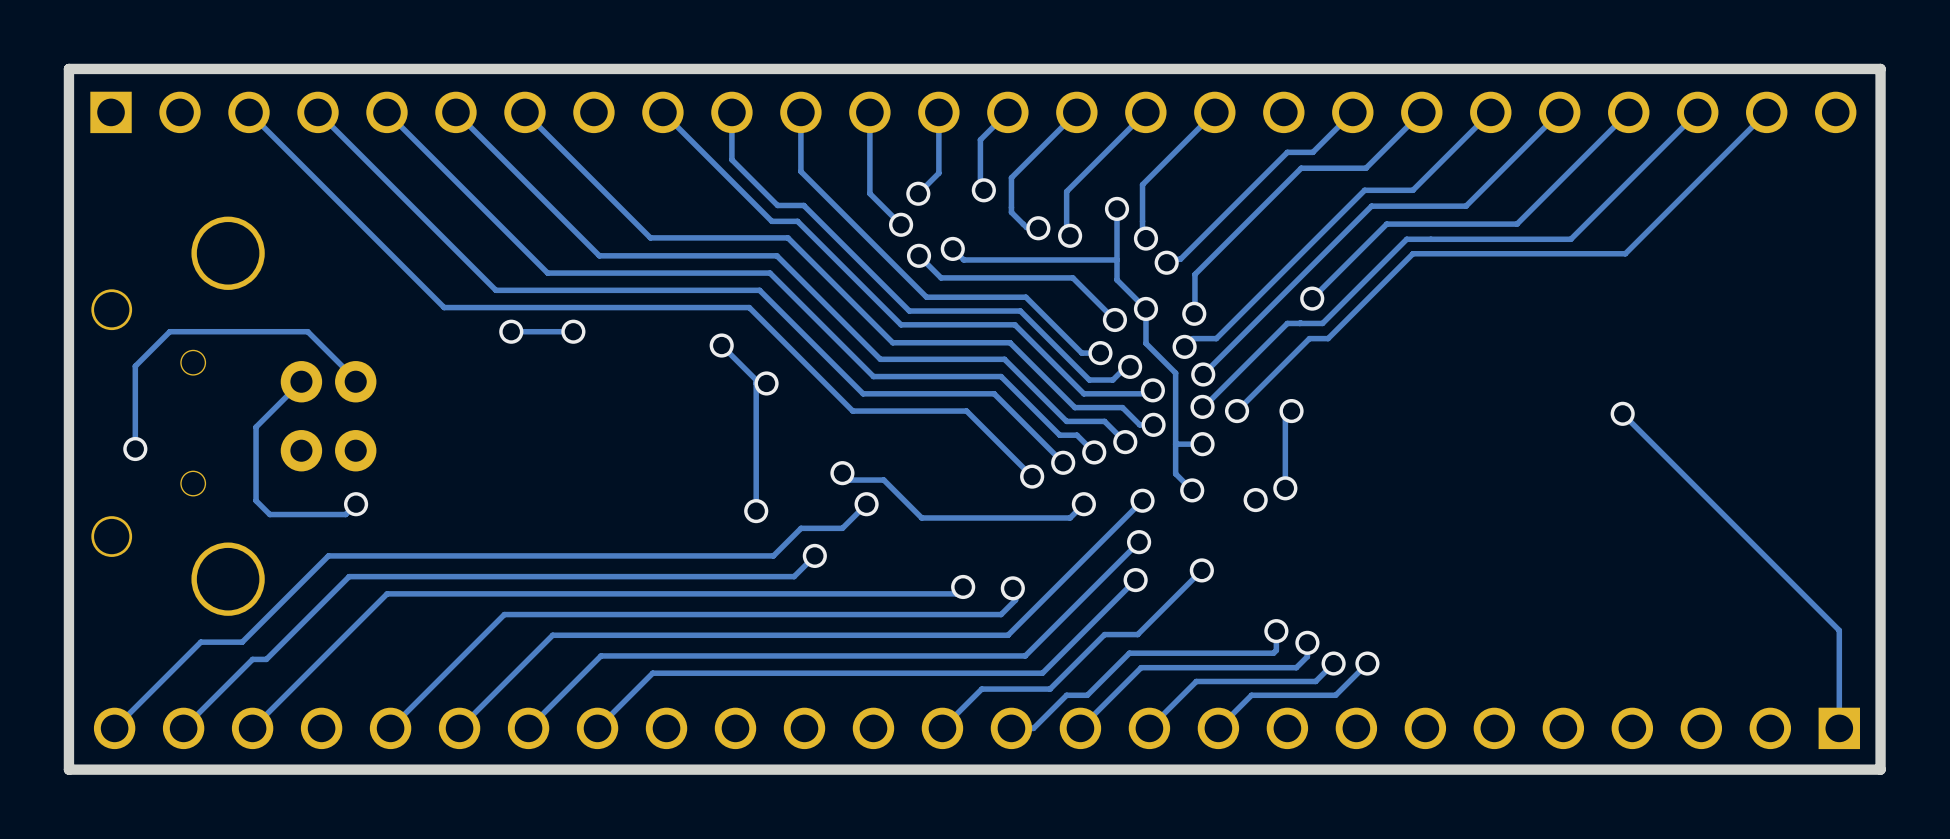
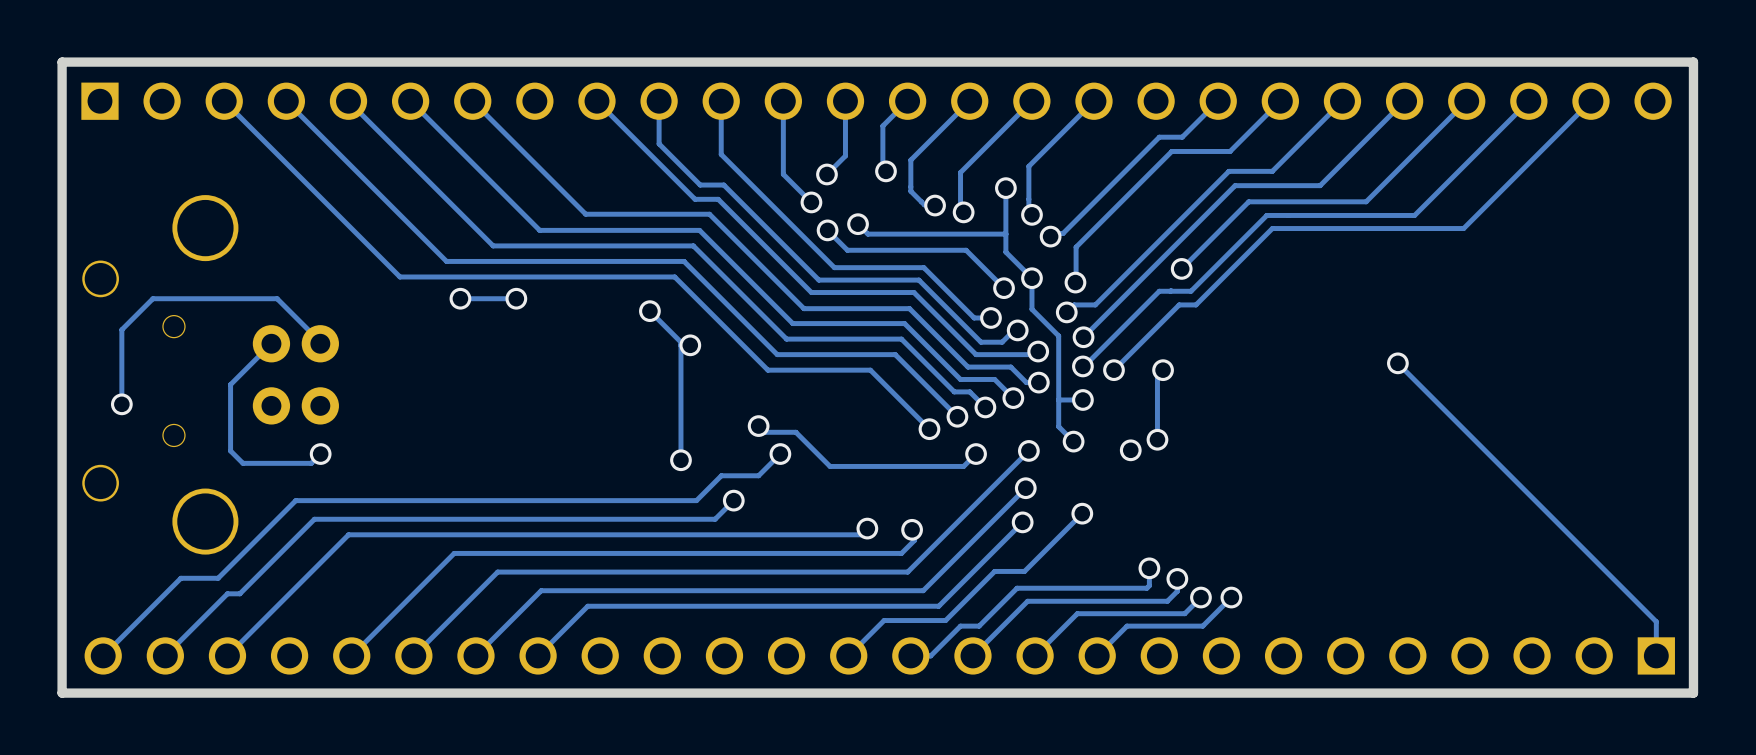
track: (1622, 413) (1839, 630) (1839, 690) -> (1397, 363) (1656, 621)
via position: (1622, 413) -> (1397, 363)

